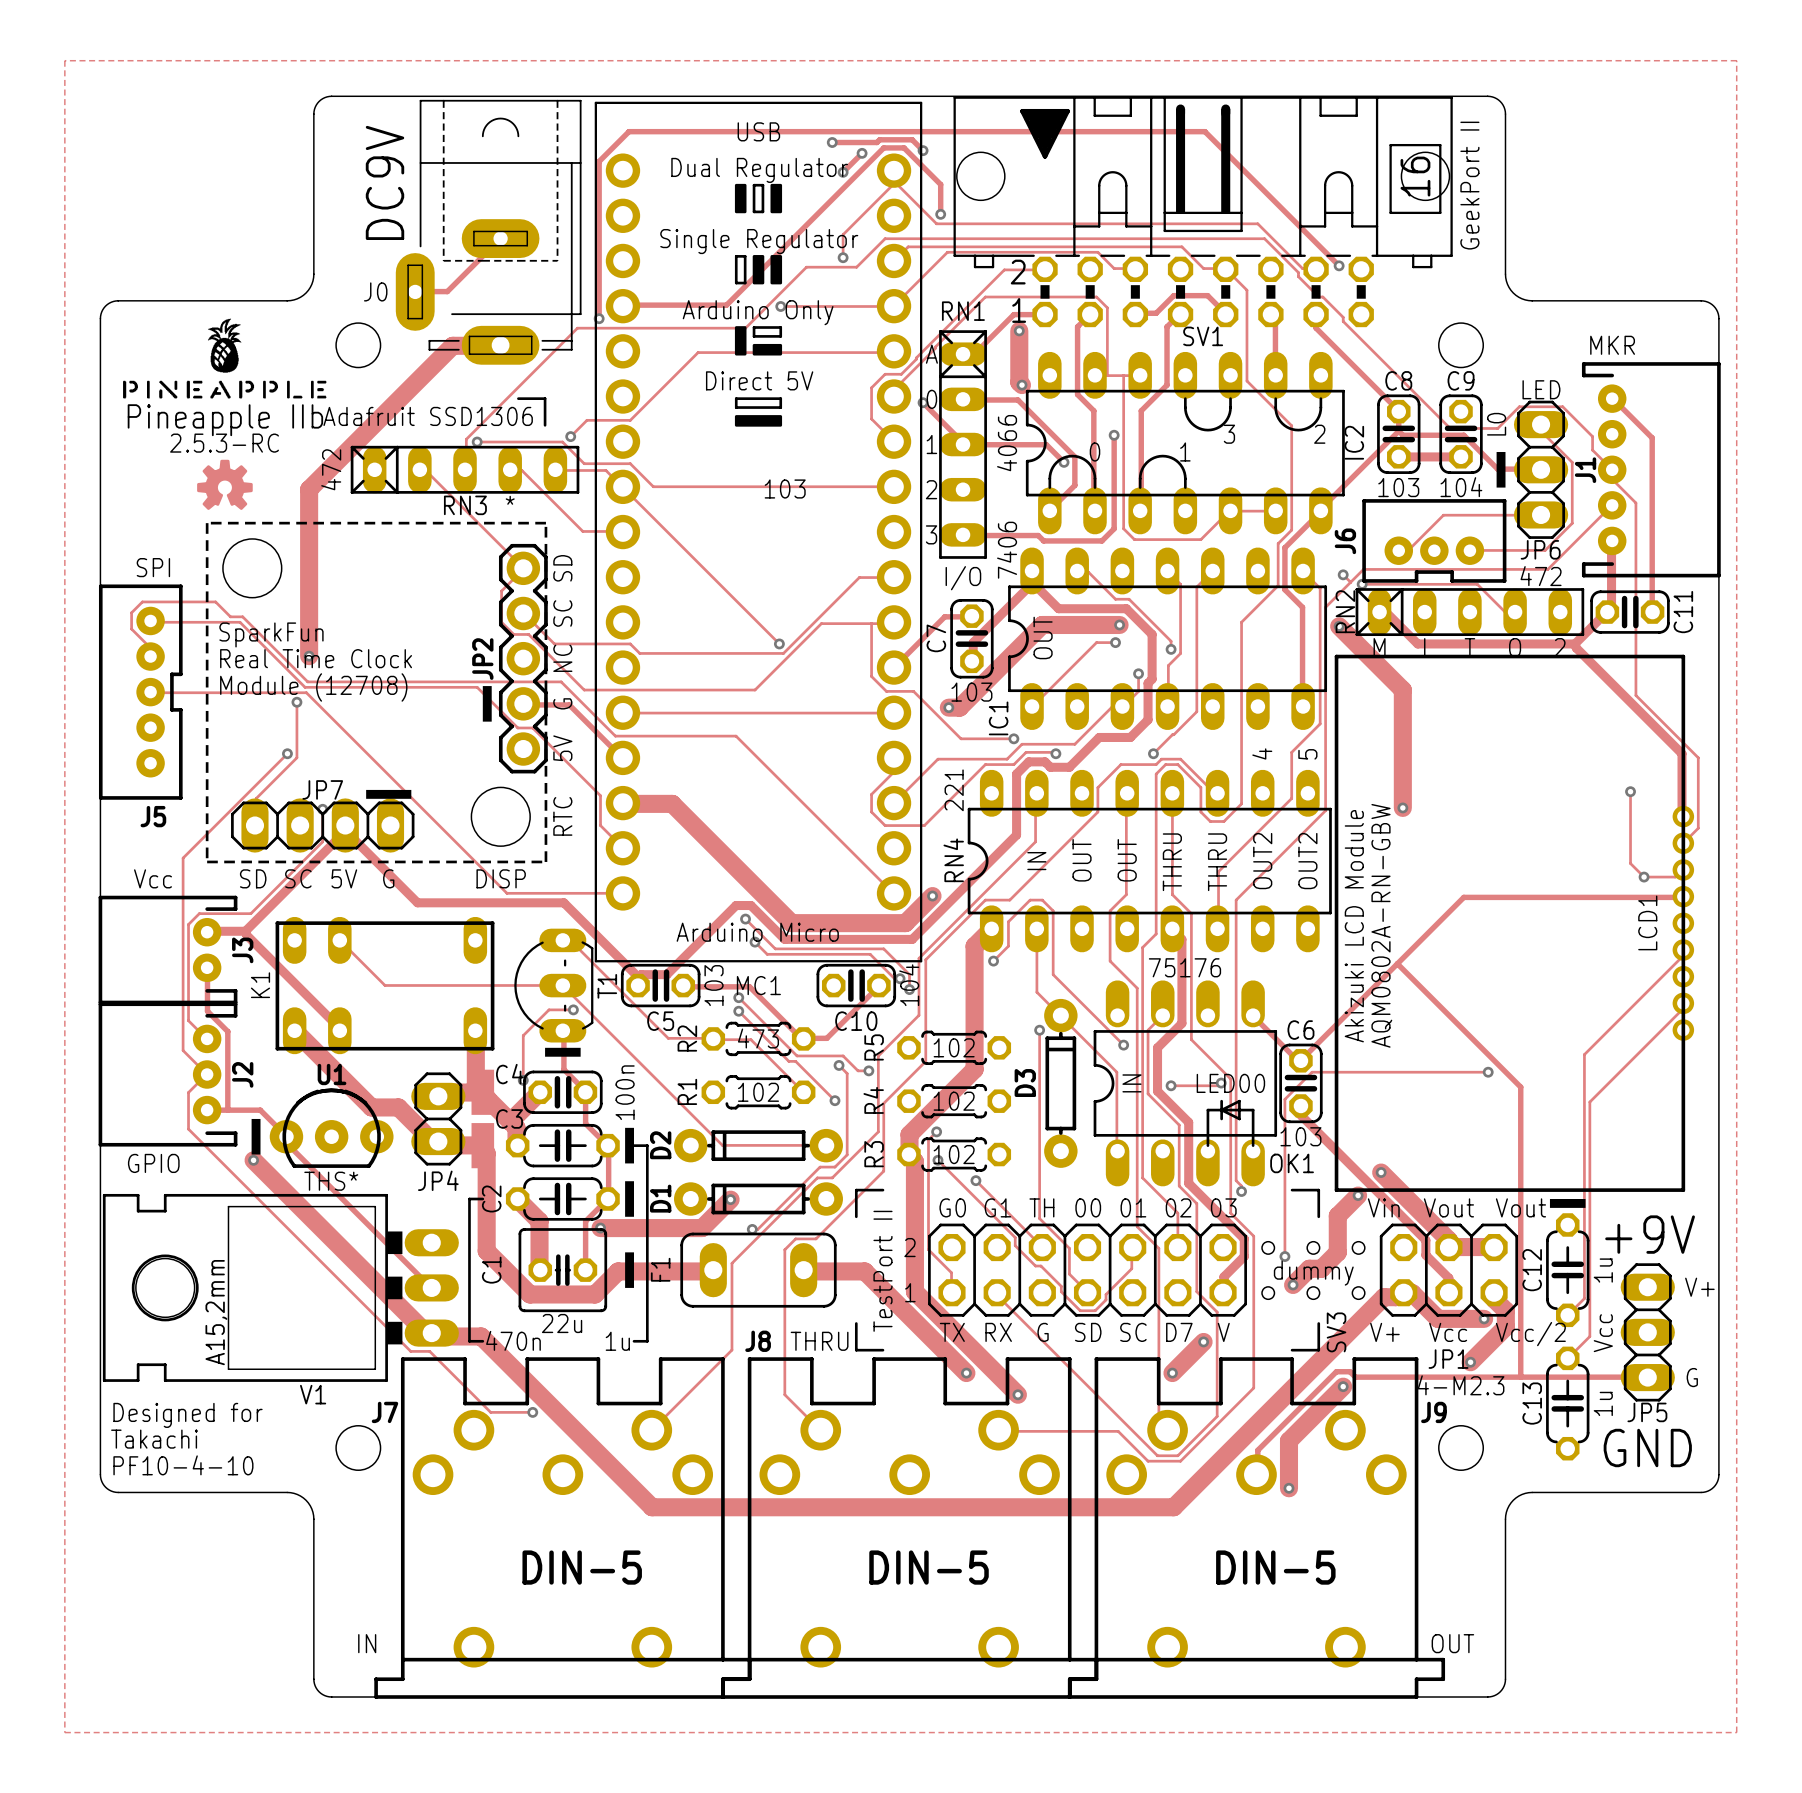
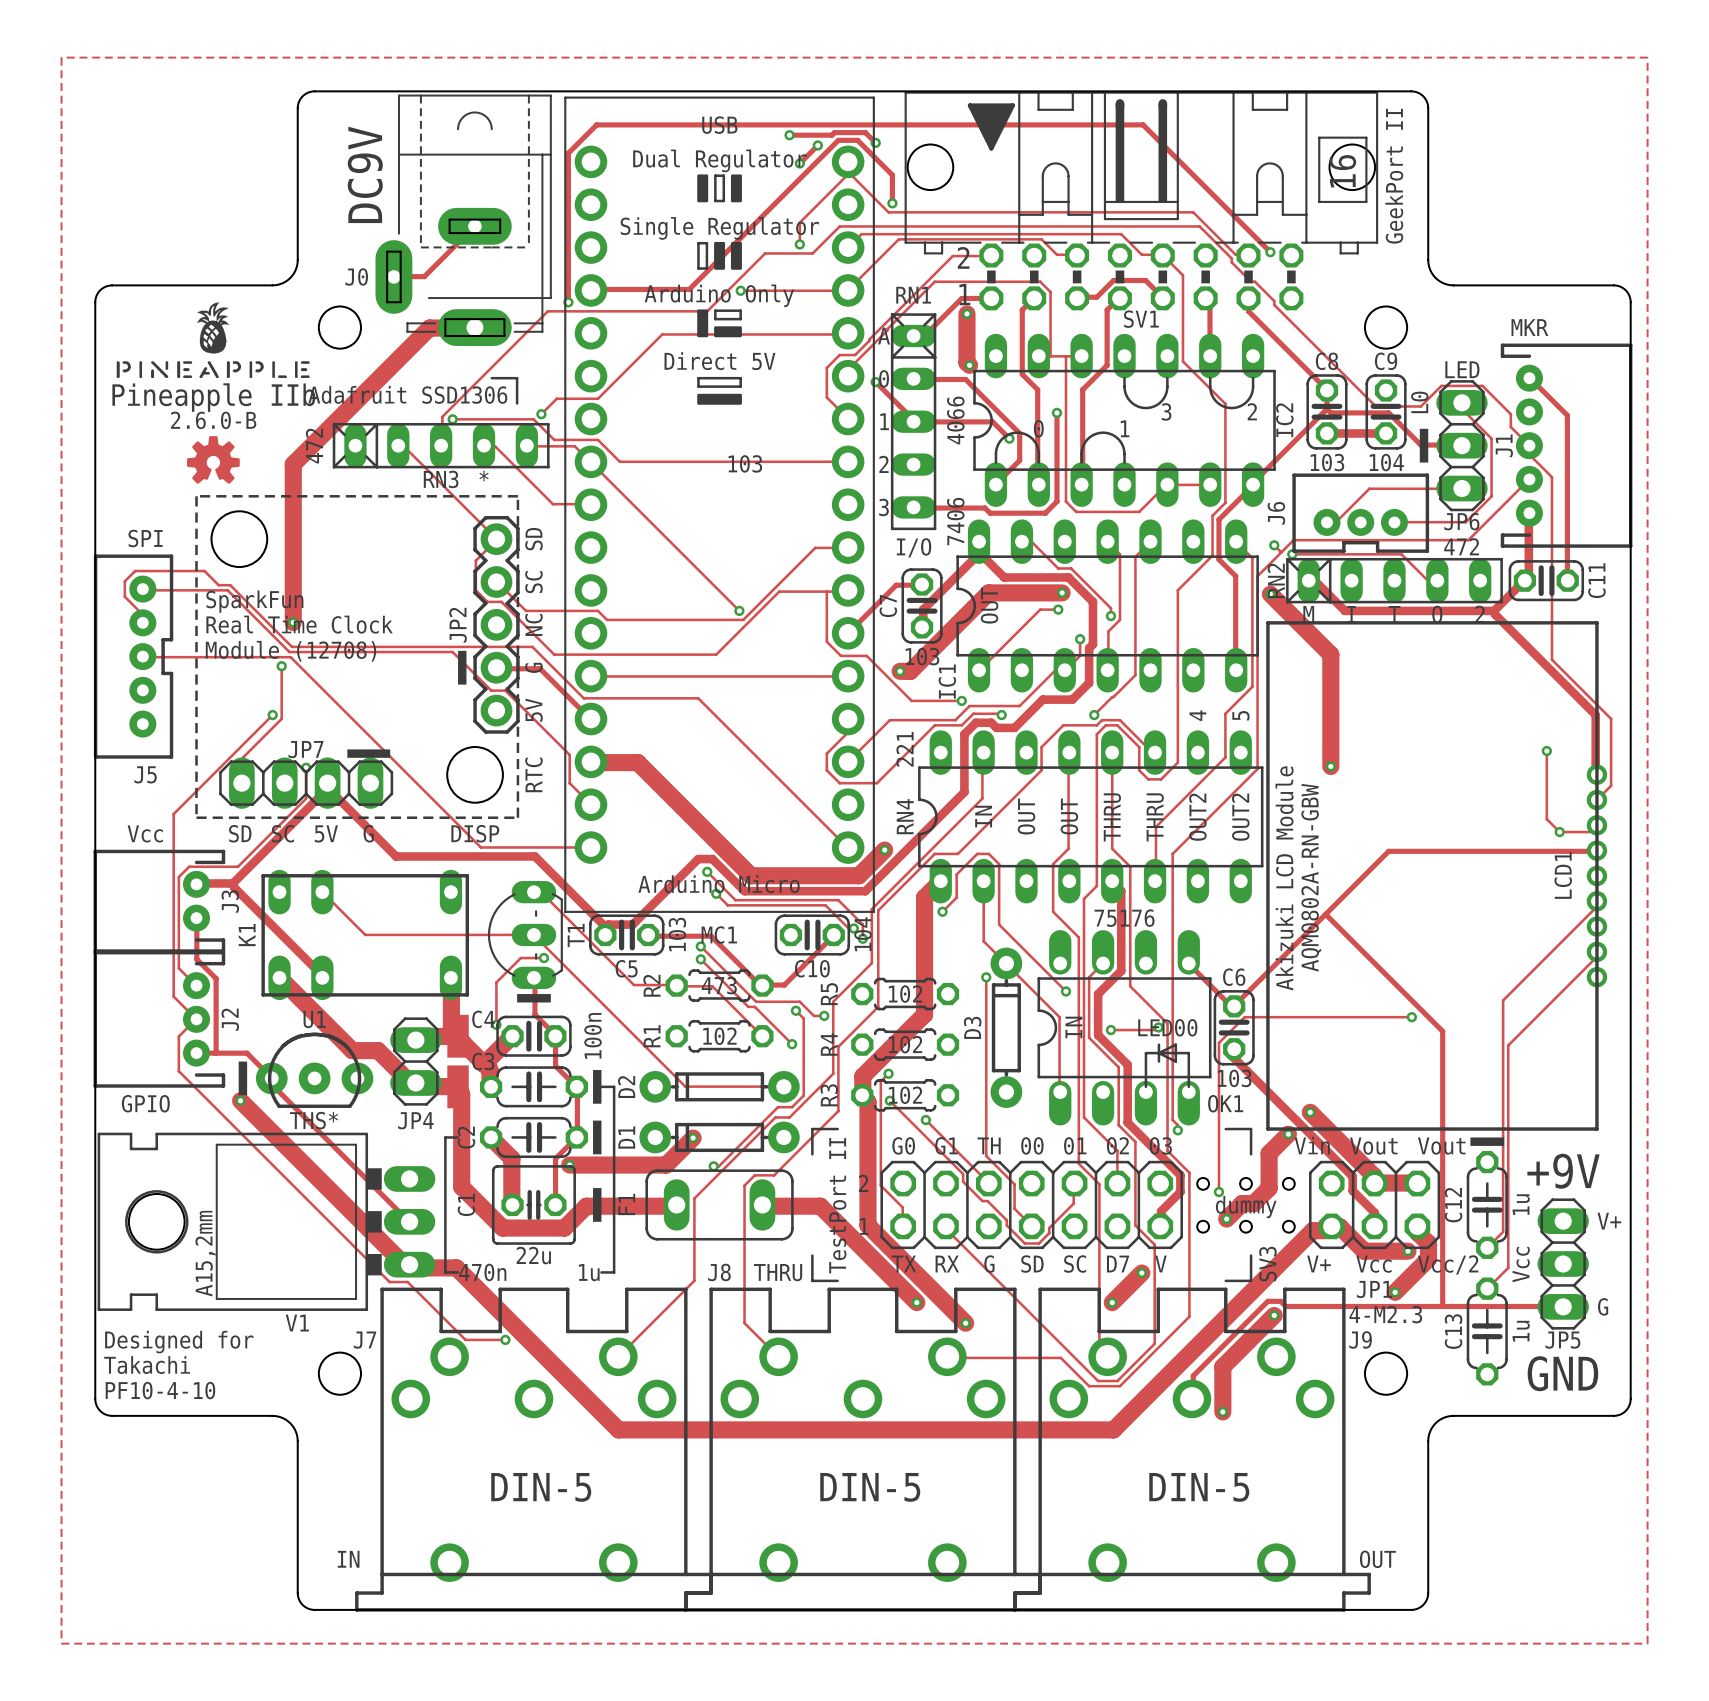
text: 2.5.3-RC (224, 443) -> 2.6.0-B (213, 420)

